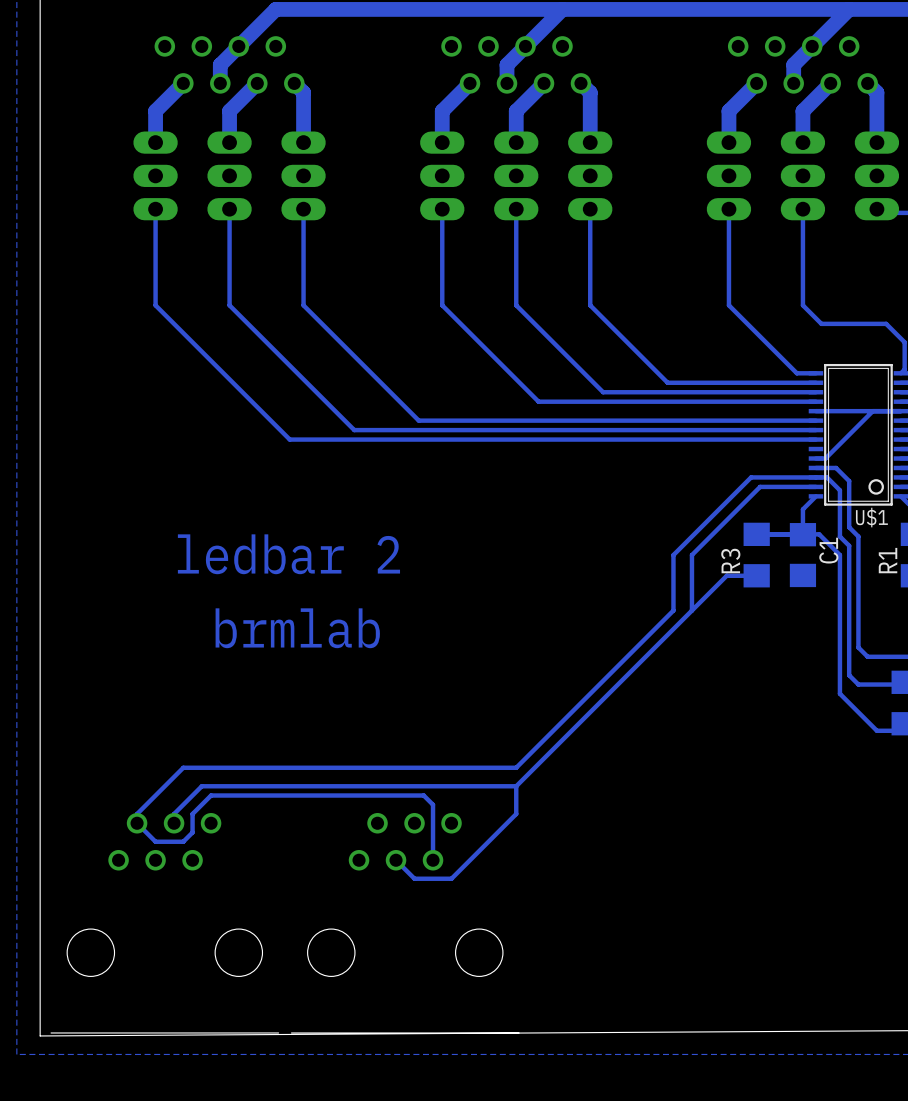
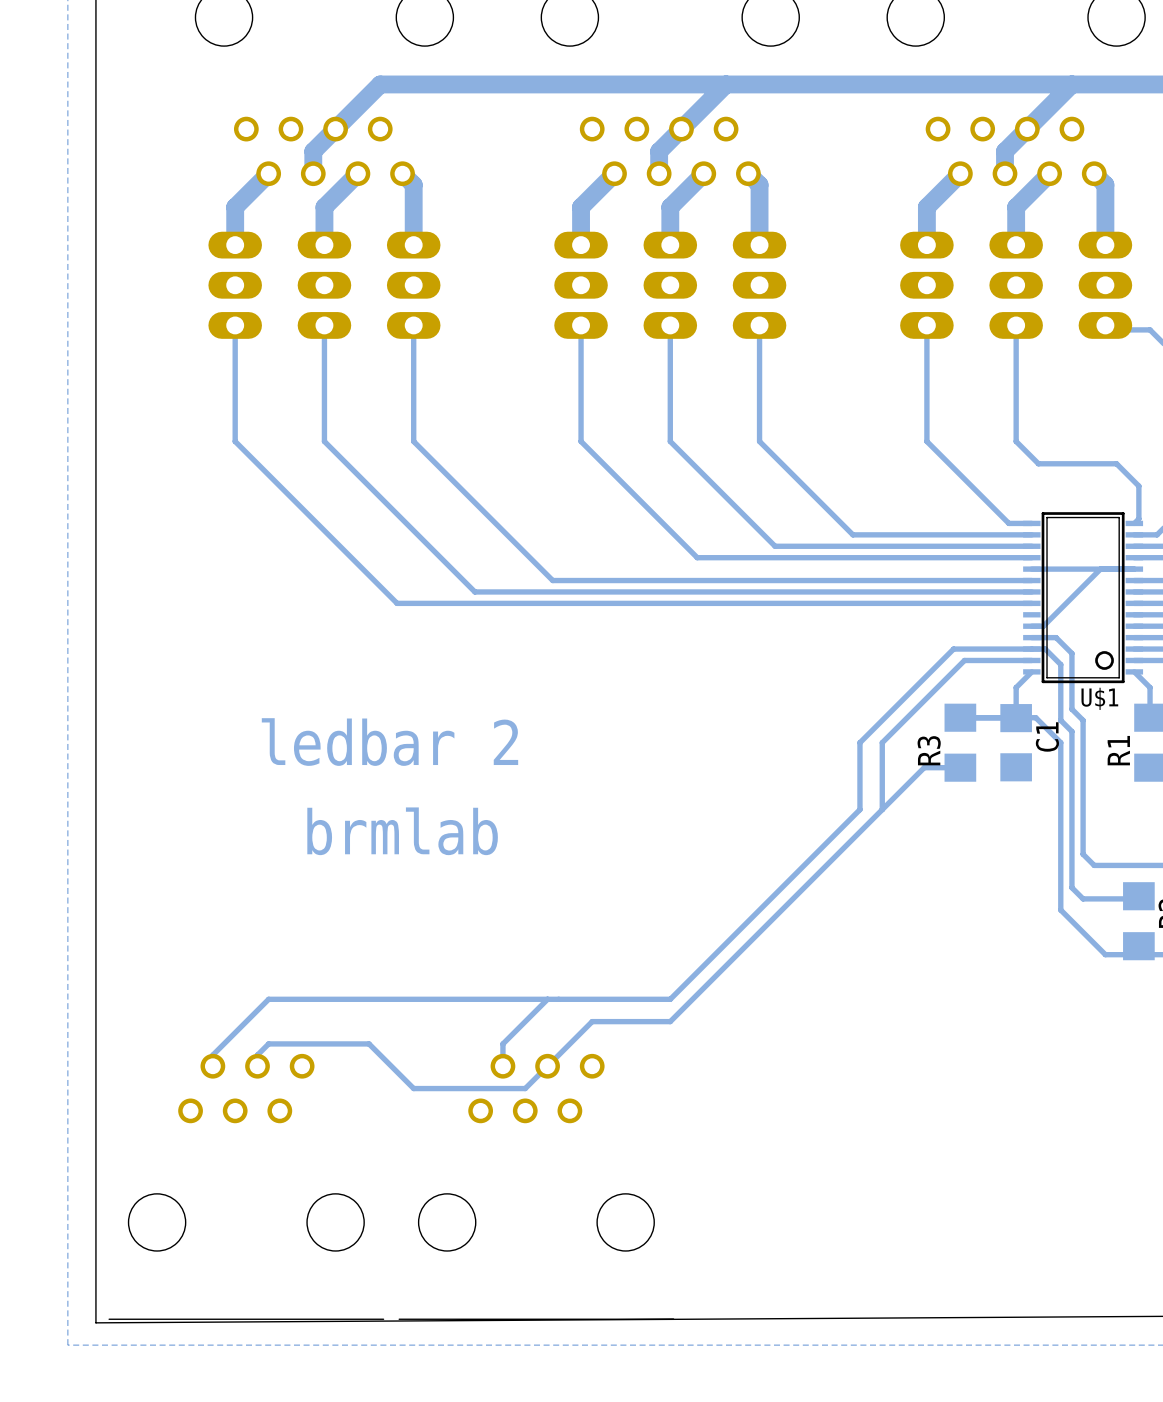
track: none -> (547, 999) (502, 1043) (502, 1066)
track: (451, 786) (201, 786) (183, 804) -> (592, 1021) (525, 1088) (413, 1088) (369, 1043) (268, 1043)
track: (516, 786) (516, 814) (451, 878) (414, 878) (396, 860) -> none
track: (137, 823) (155, 841) (183, 841) (192, 832) (192, 814) (211, 795) (423, 795) (433, 804) (433, 860) -> none

